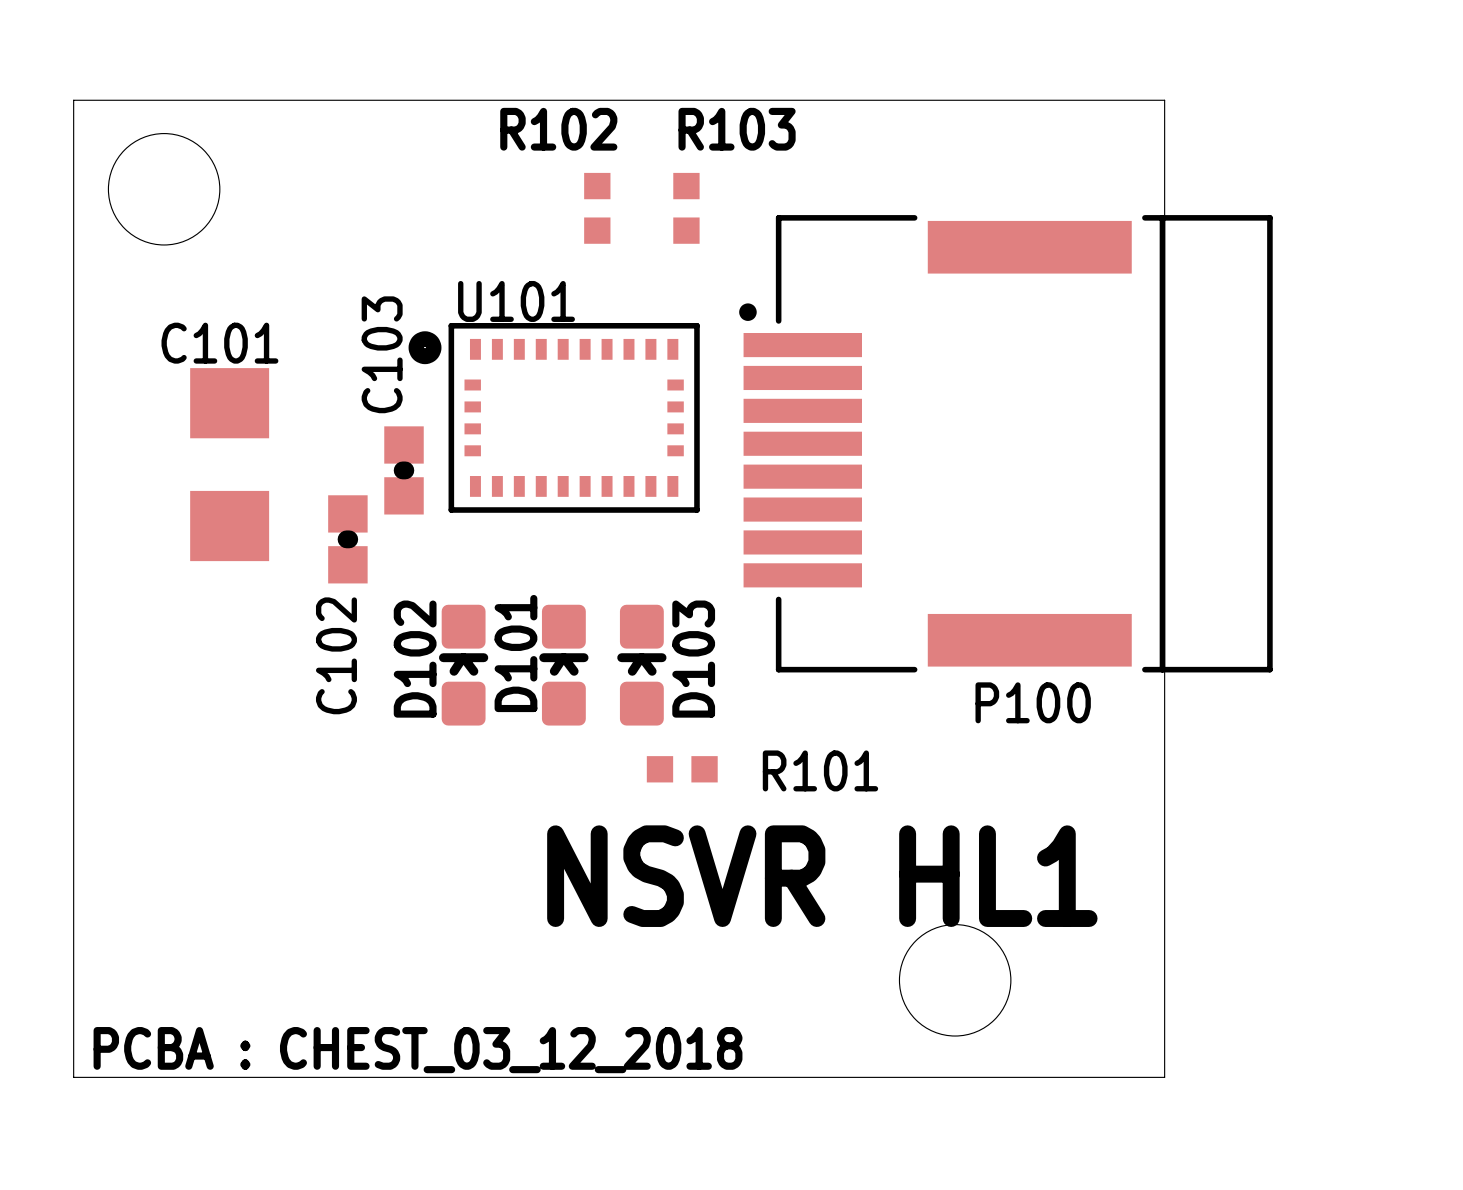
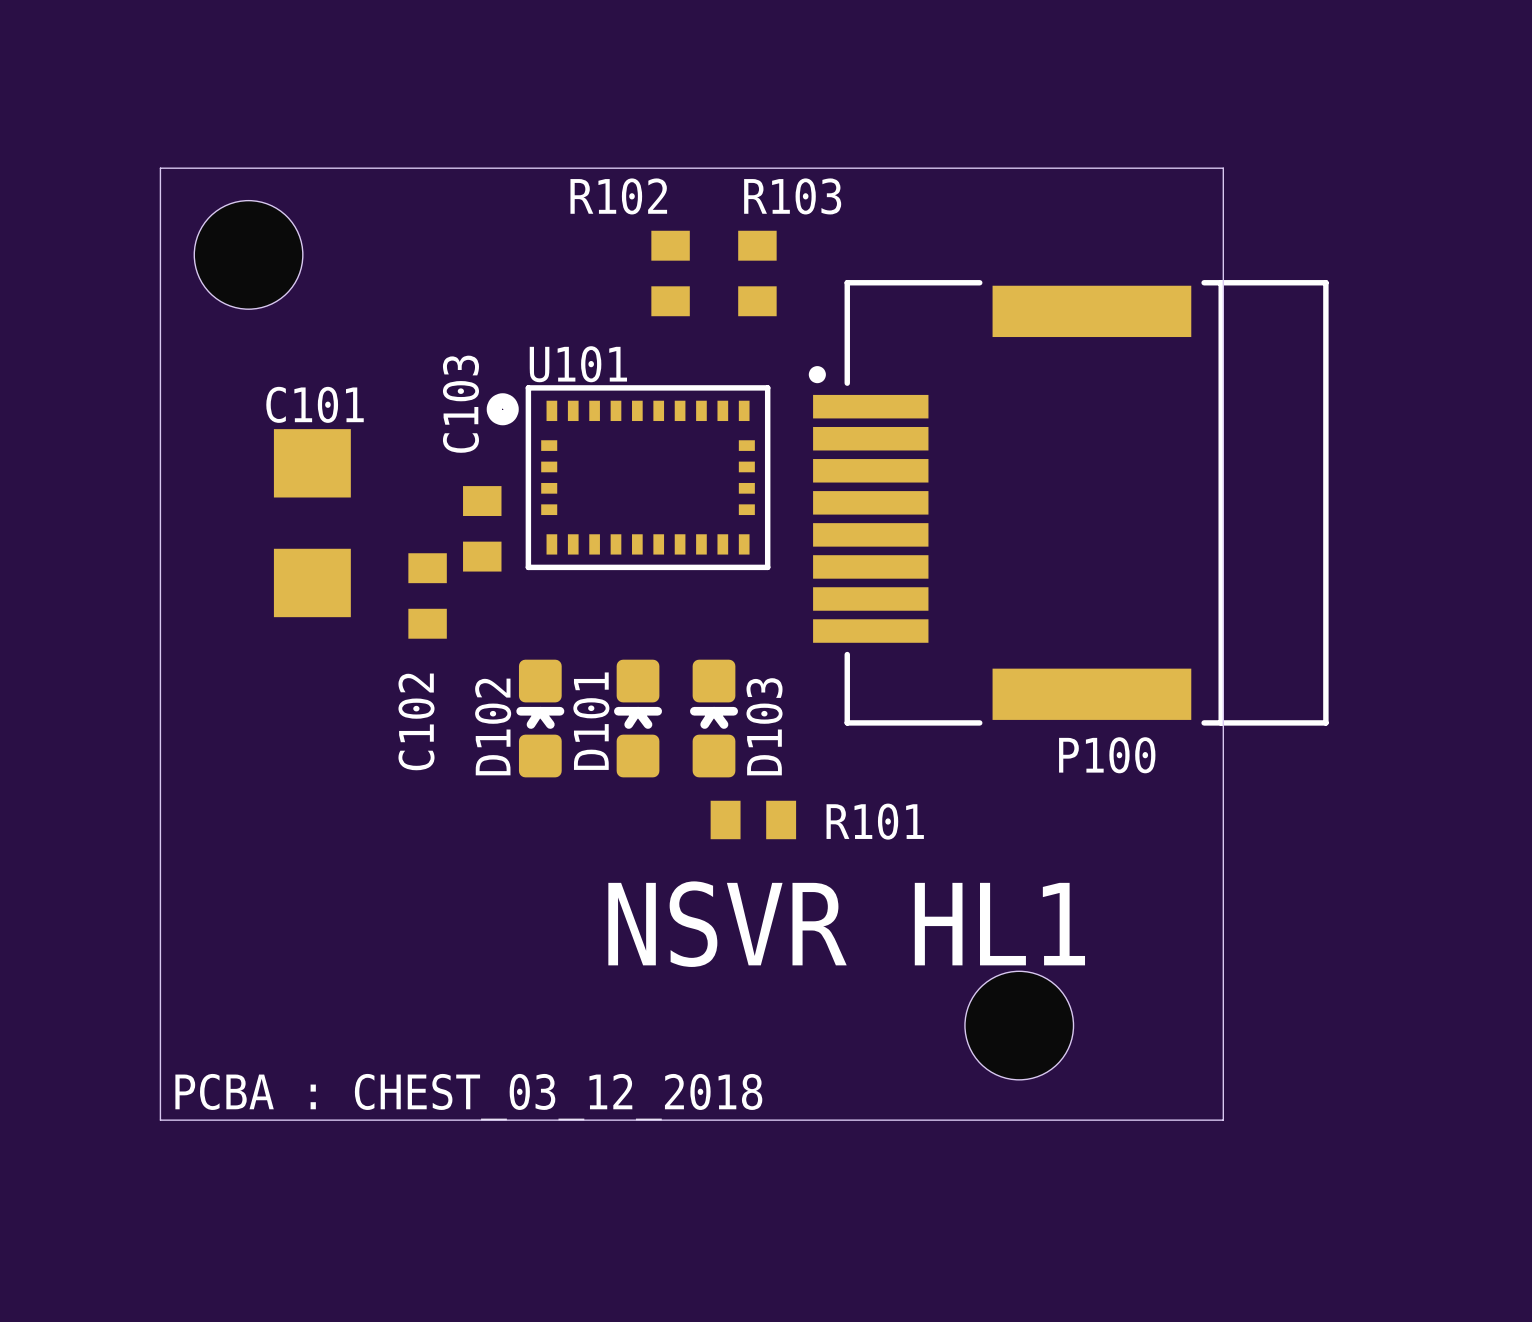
R102 footprint: [584, 172, 611, 244] -> [651, 230, 690, 317]
R103 footprint: [673, 172, 700, 244] -> [738, 230, 777, 317]
C103 footprint: [384, 426, 424, 515] -> [463, 486, 502, 572]
C102 footprint: [328, 495, 368, 584] -> [408, 553, 447, 639]
R101 footprint: [646, 756, 718, 783] -> [710, 800, 797, 840]

